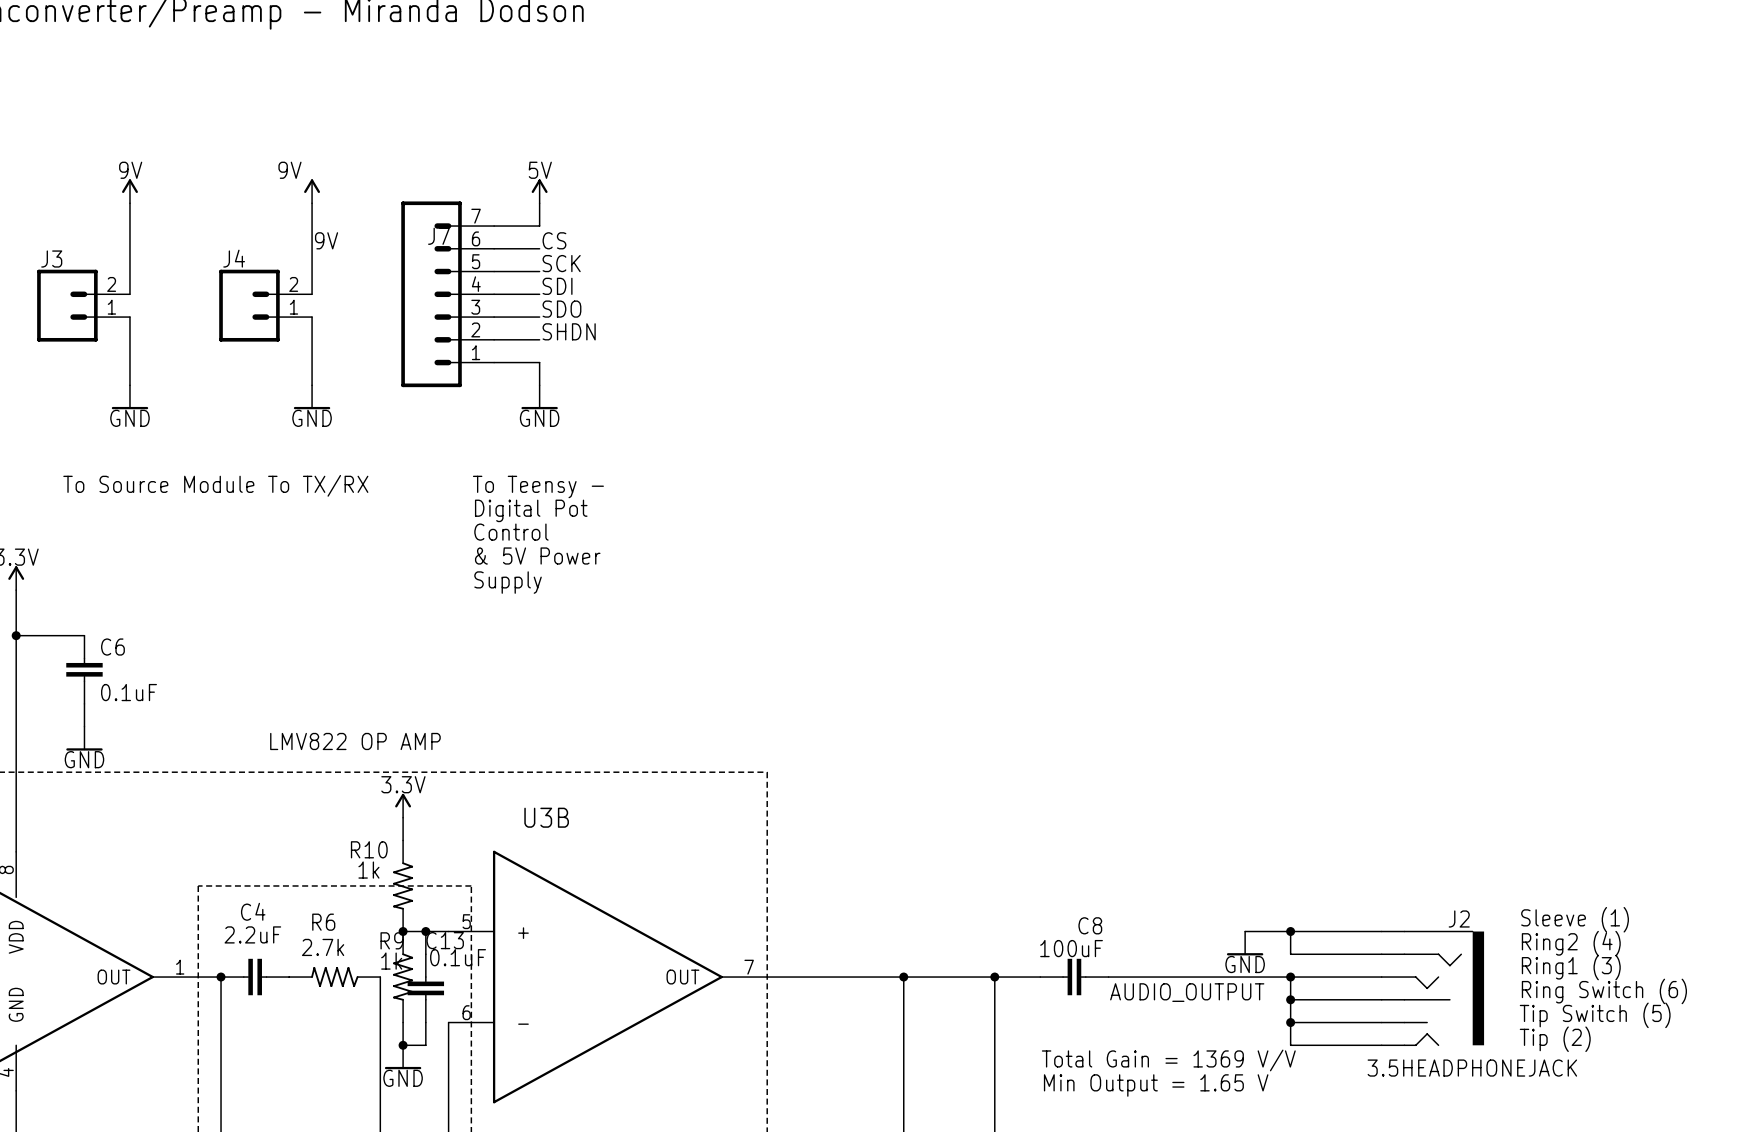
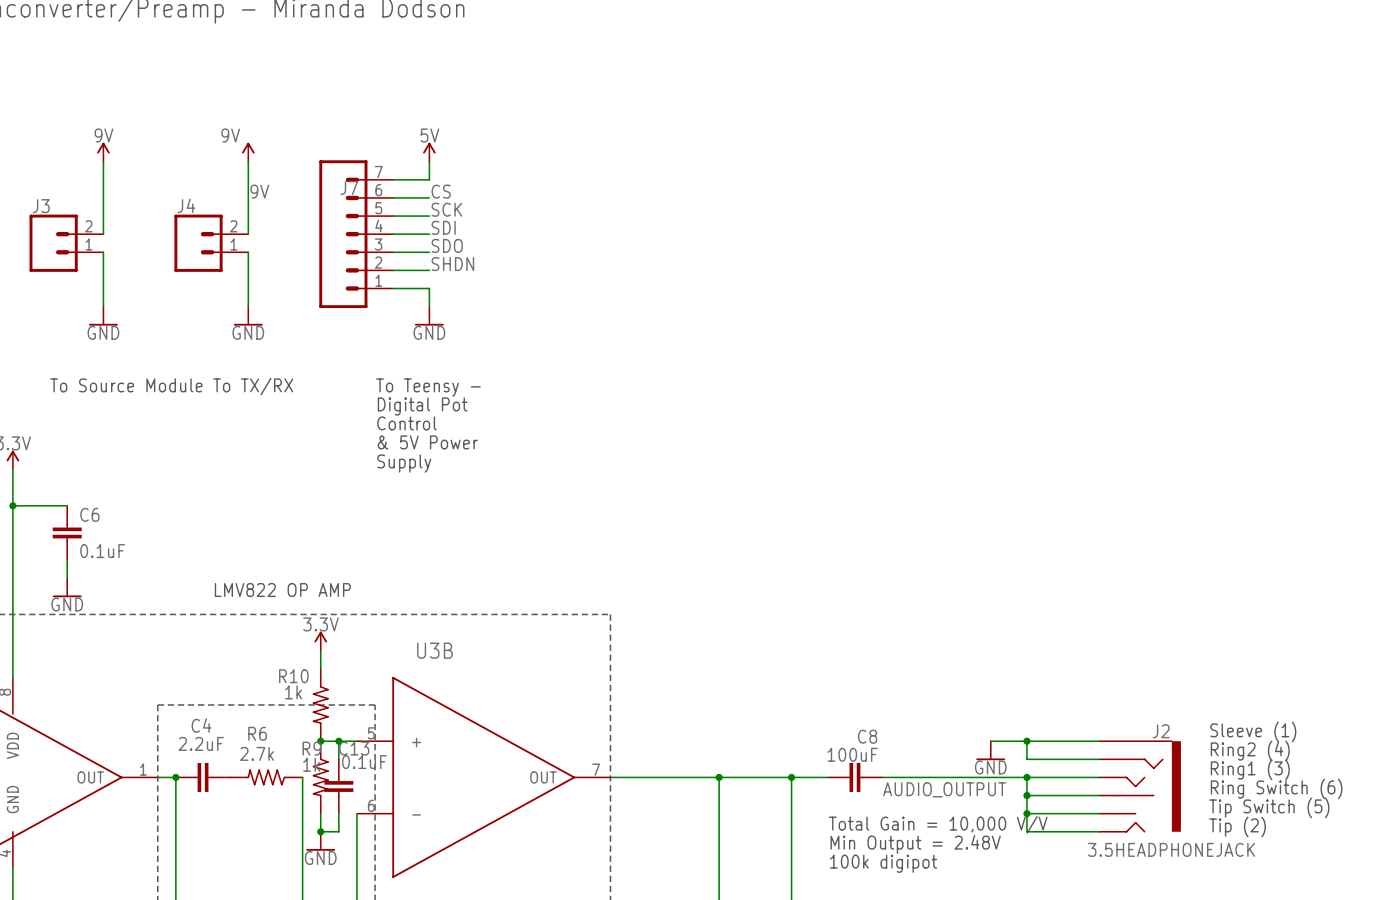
text: none -> Total Gain = 10,000 V/V (938, 824)
text: Total Gain = 1369 V/V (1168, 1060) -> Min Output = 2.48V (915, 844)
text: Min Output = 1.65 V (1156, 1085) -> 100k digipot (883, 863)

